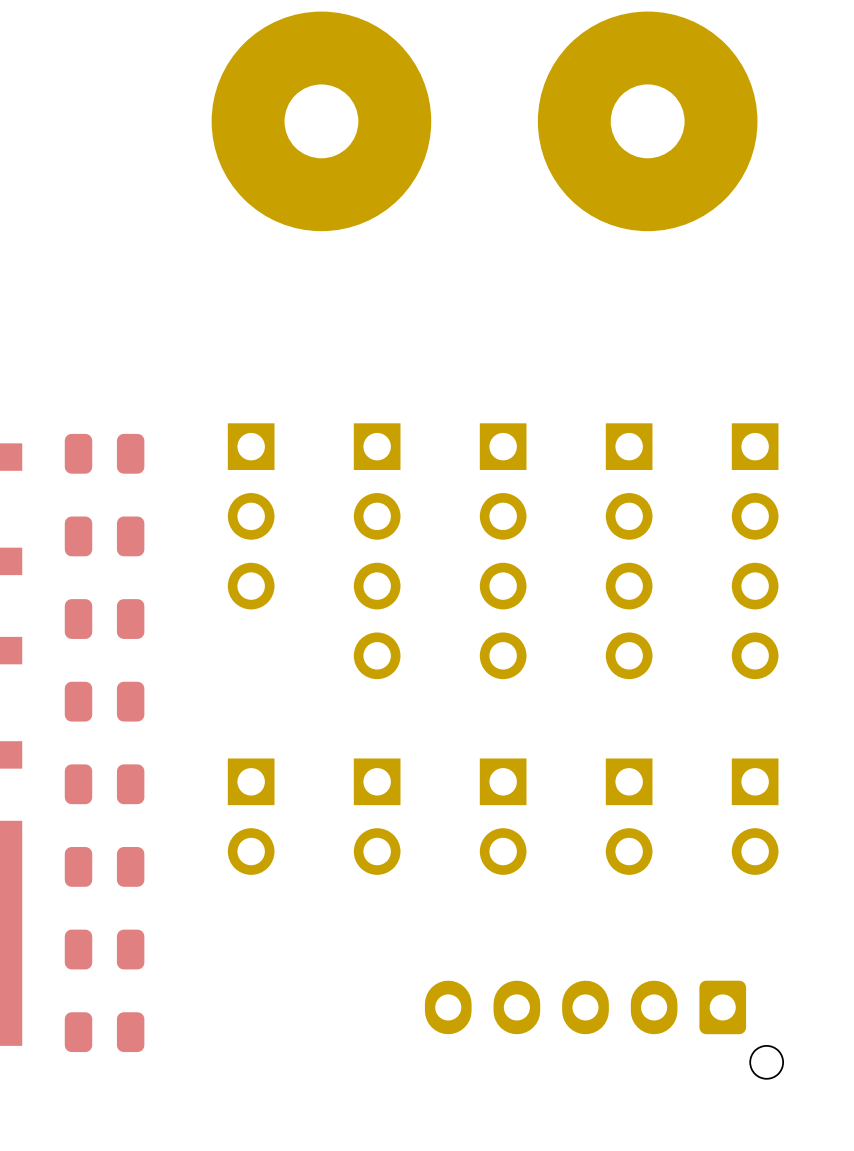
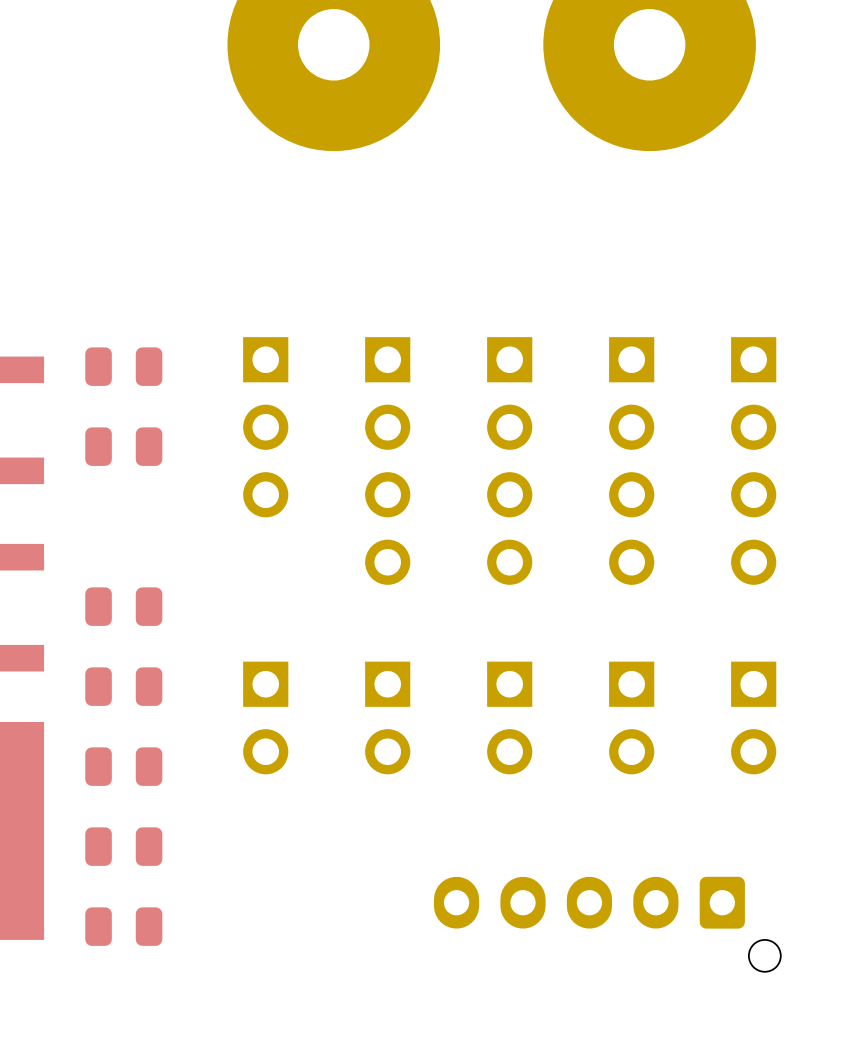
part: (104, 619) -> none

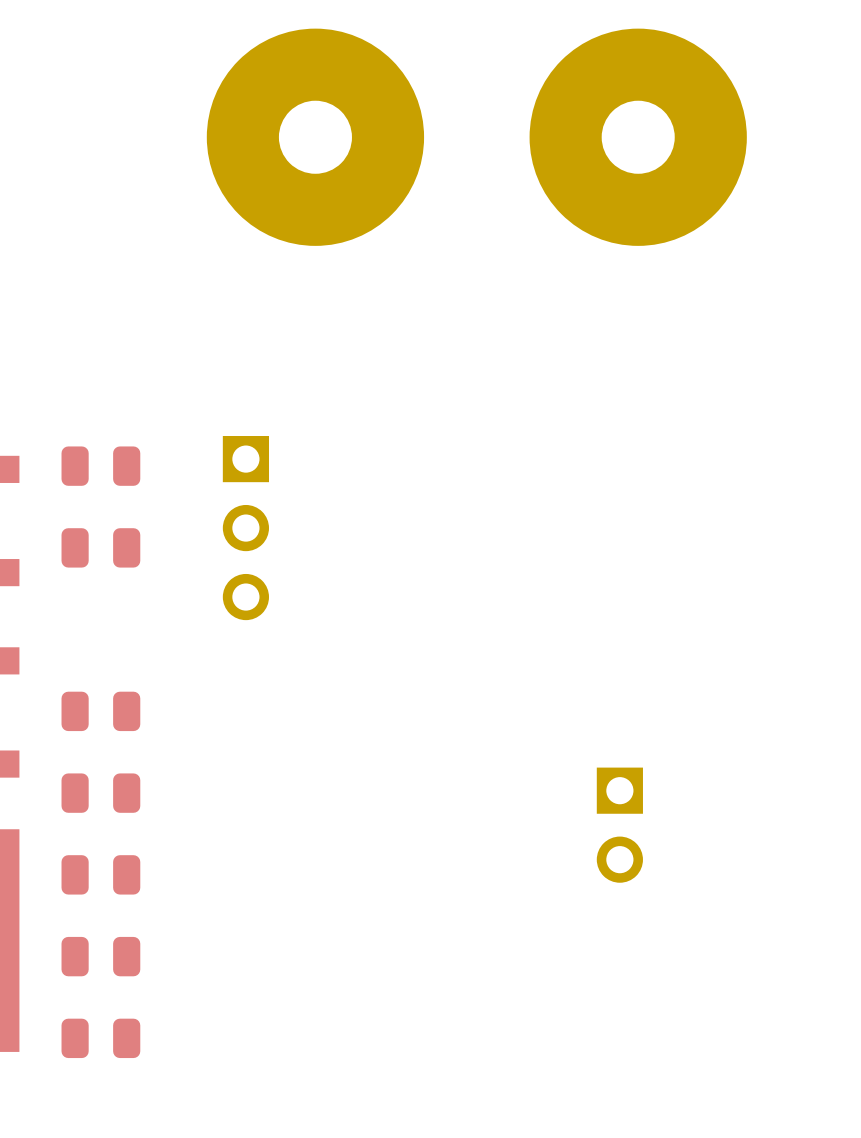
part: (387, 460) -> none
part: (509, 460) -> none
part: (631, 460) -> none
part: (753, 460) -> none
part: (265, 717) -> none
part: (387, 717) -> none
part: (509, 717) -> none
part: (753, 717) -> none
part: (607, 924) -> none

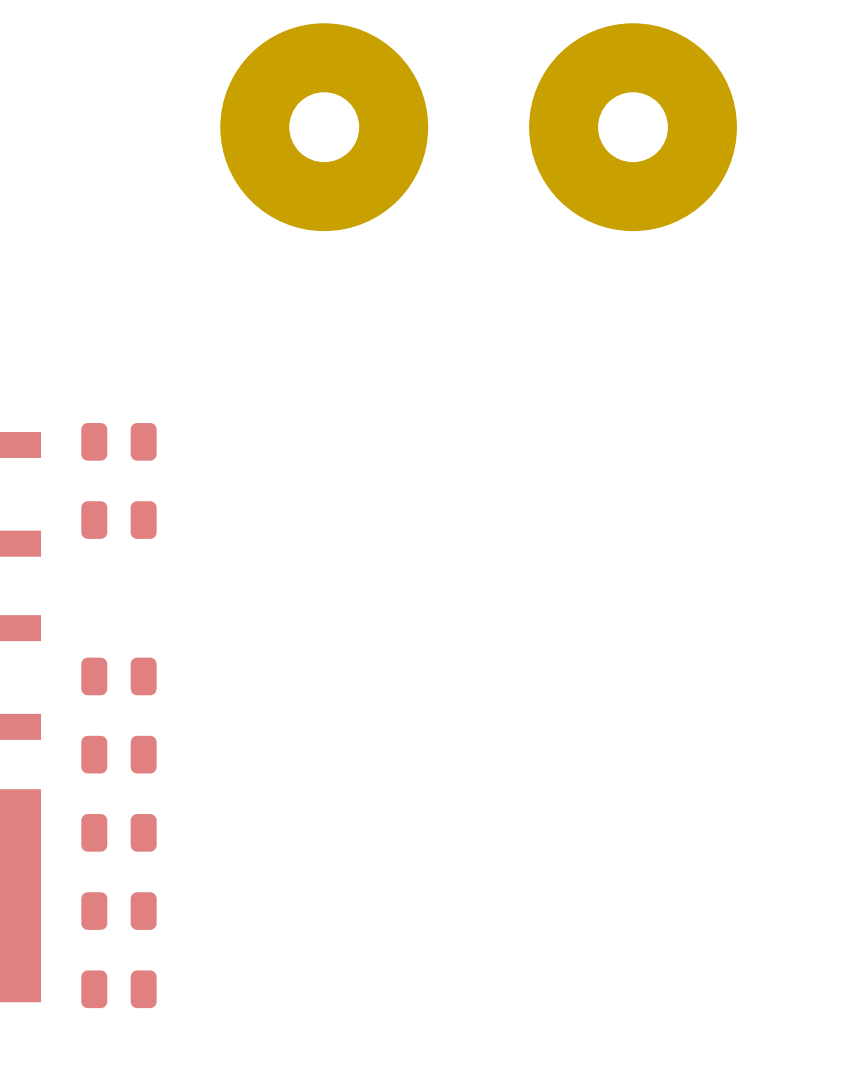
part: (245, 528) -> none
part: (619, 825) -> none

